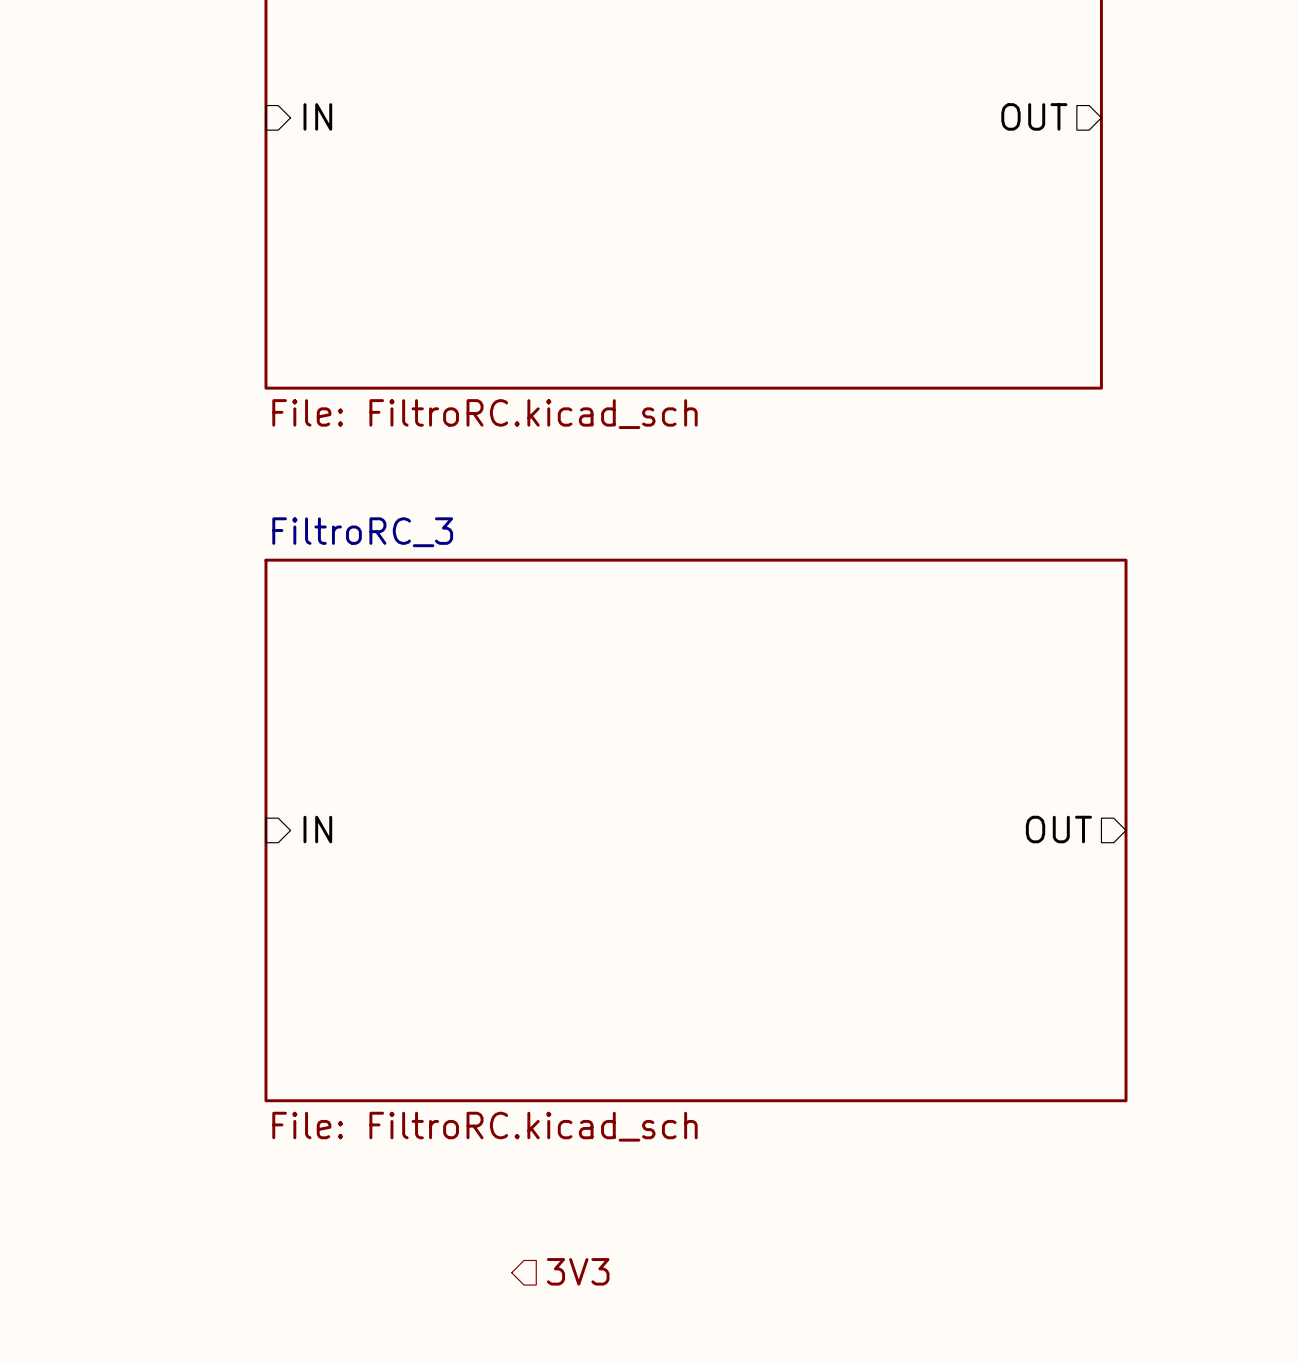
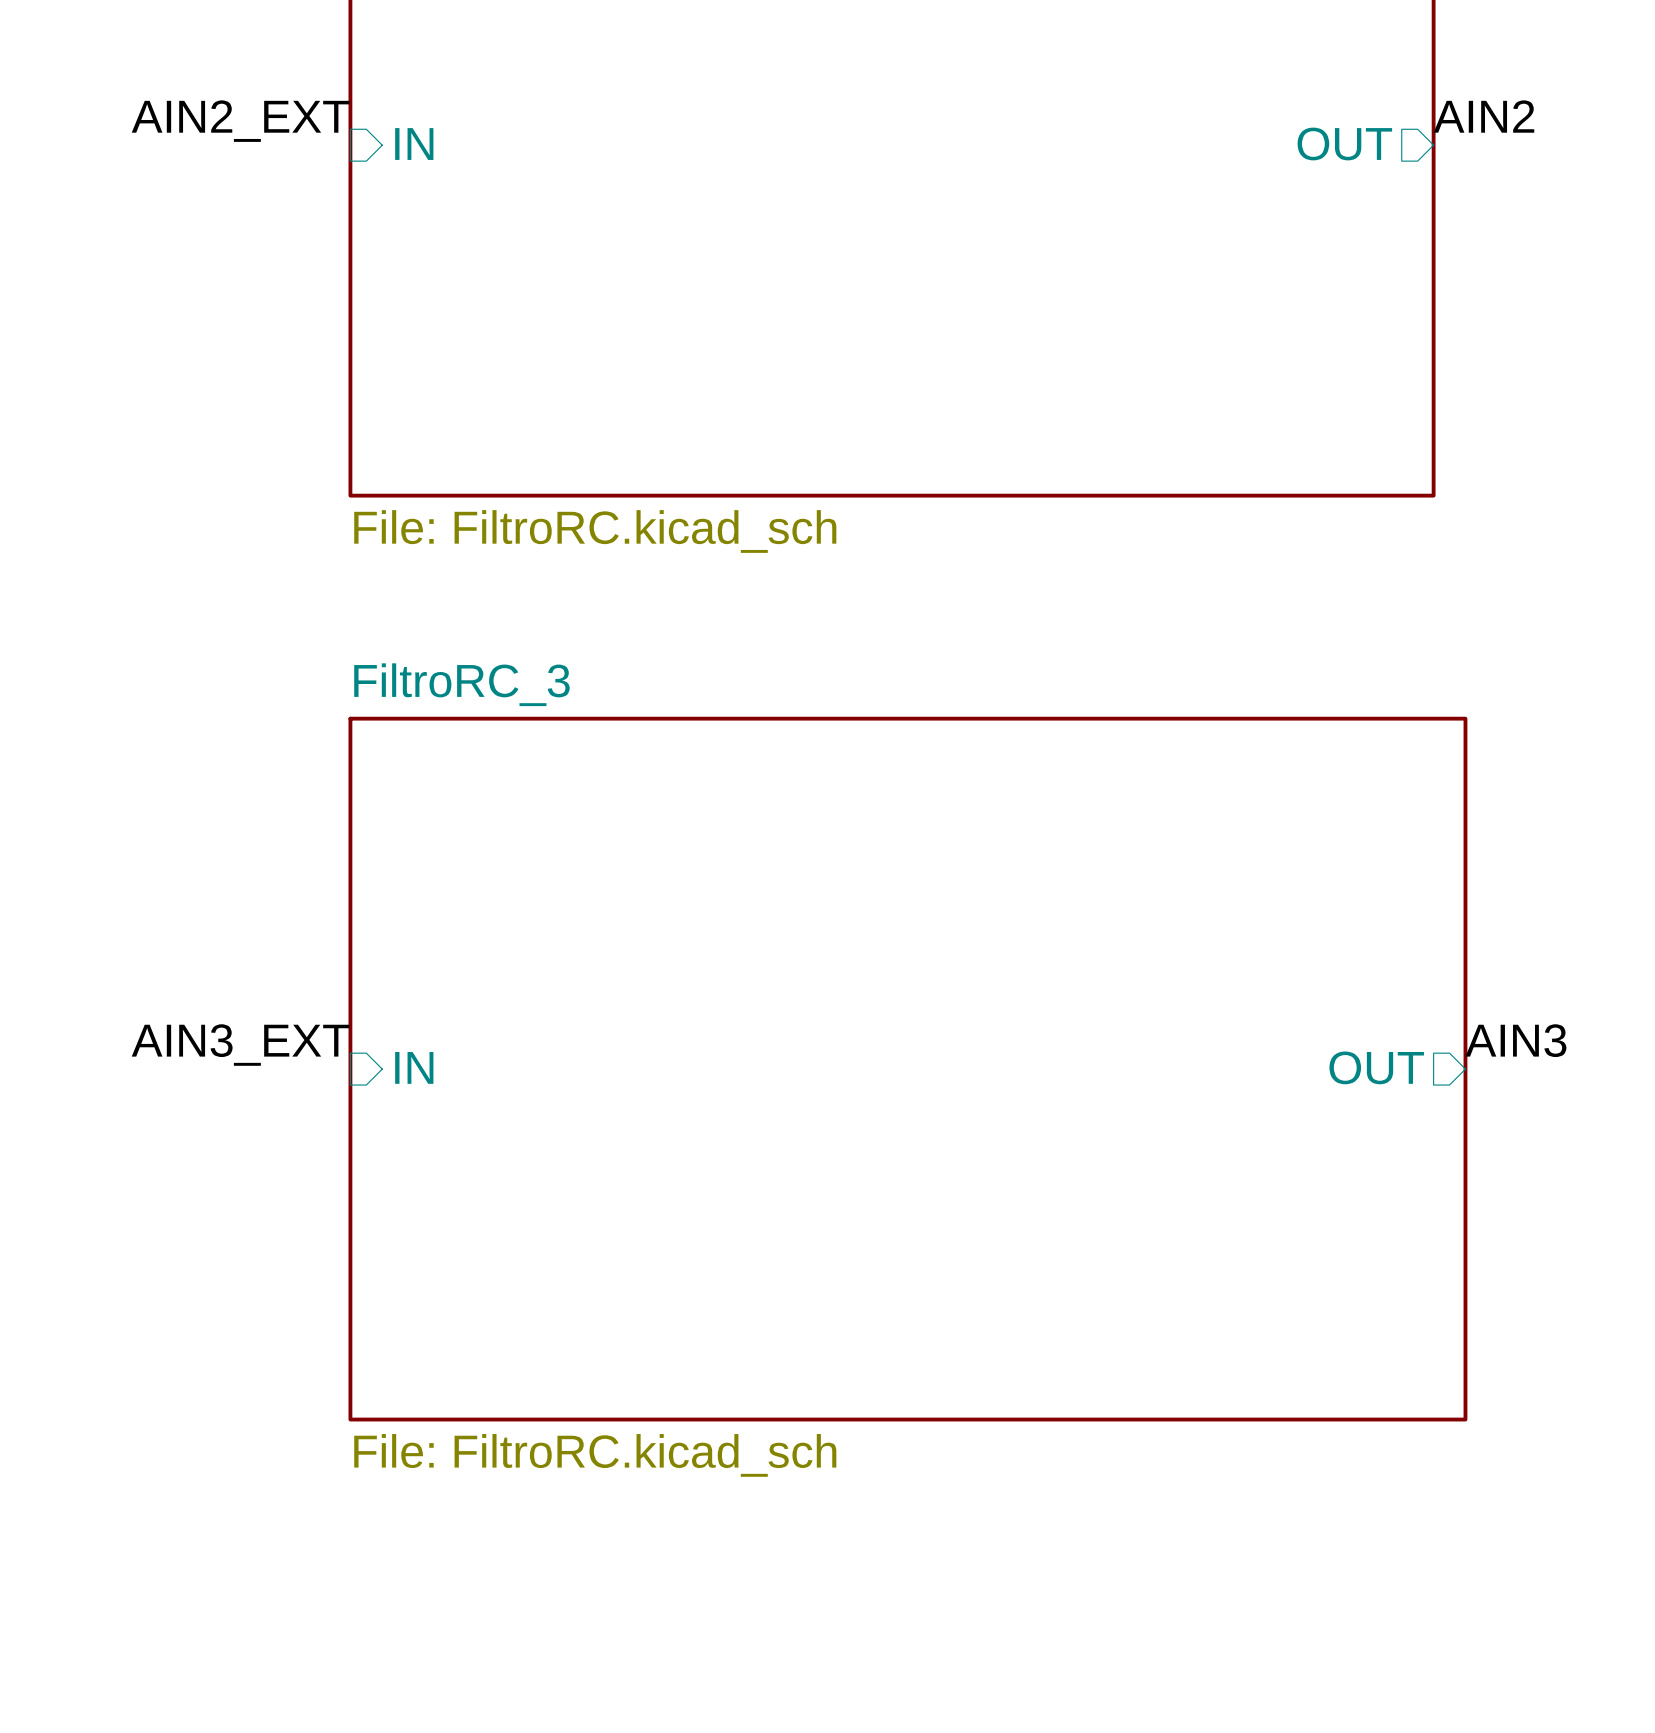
label: none -> AIN2 (1483, 116)
label: none -> AIN2_EXT (240, 121)
label: none -> AIN3 (1515, 1040)
label: none -> AIN3_EXT (240, 1045)
hierarchical label: 3V3 (578, 1271) -> none

